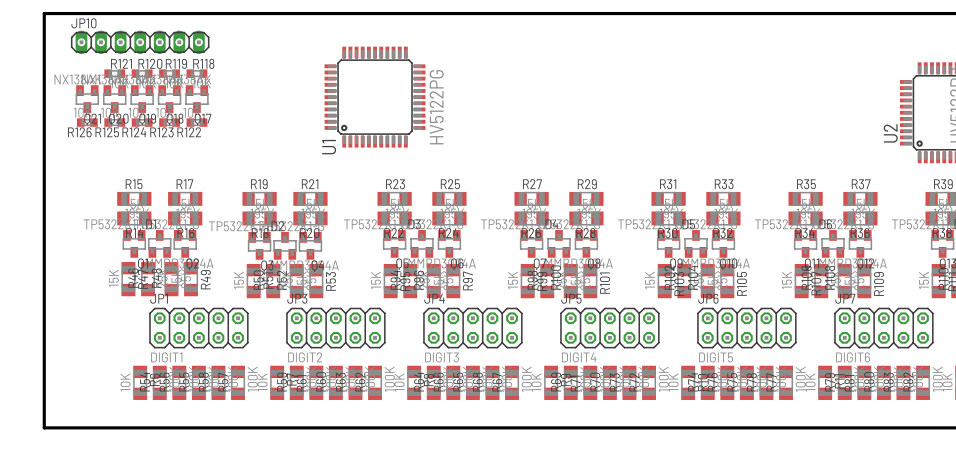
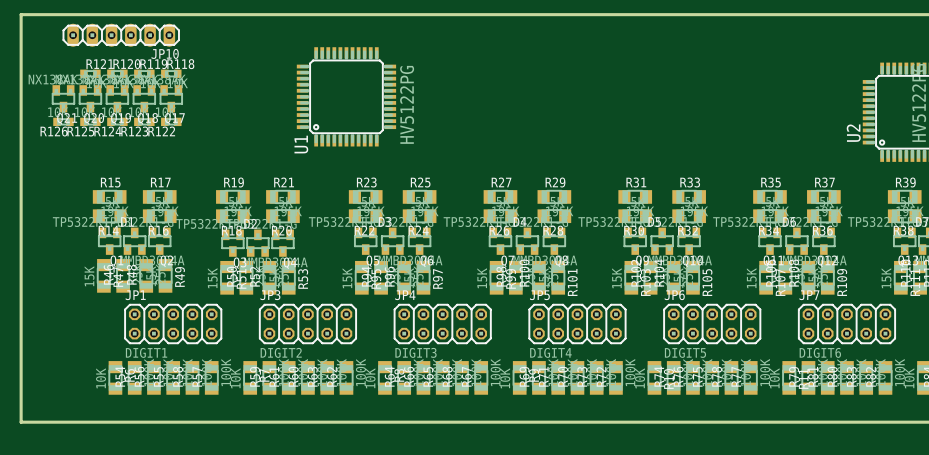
JP10 name position: JP10 (83, 23) -> JP10 (165, 53)
JP10 footprint: [71, 30, 210, 55] -> [62, 23, 180, 47]

